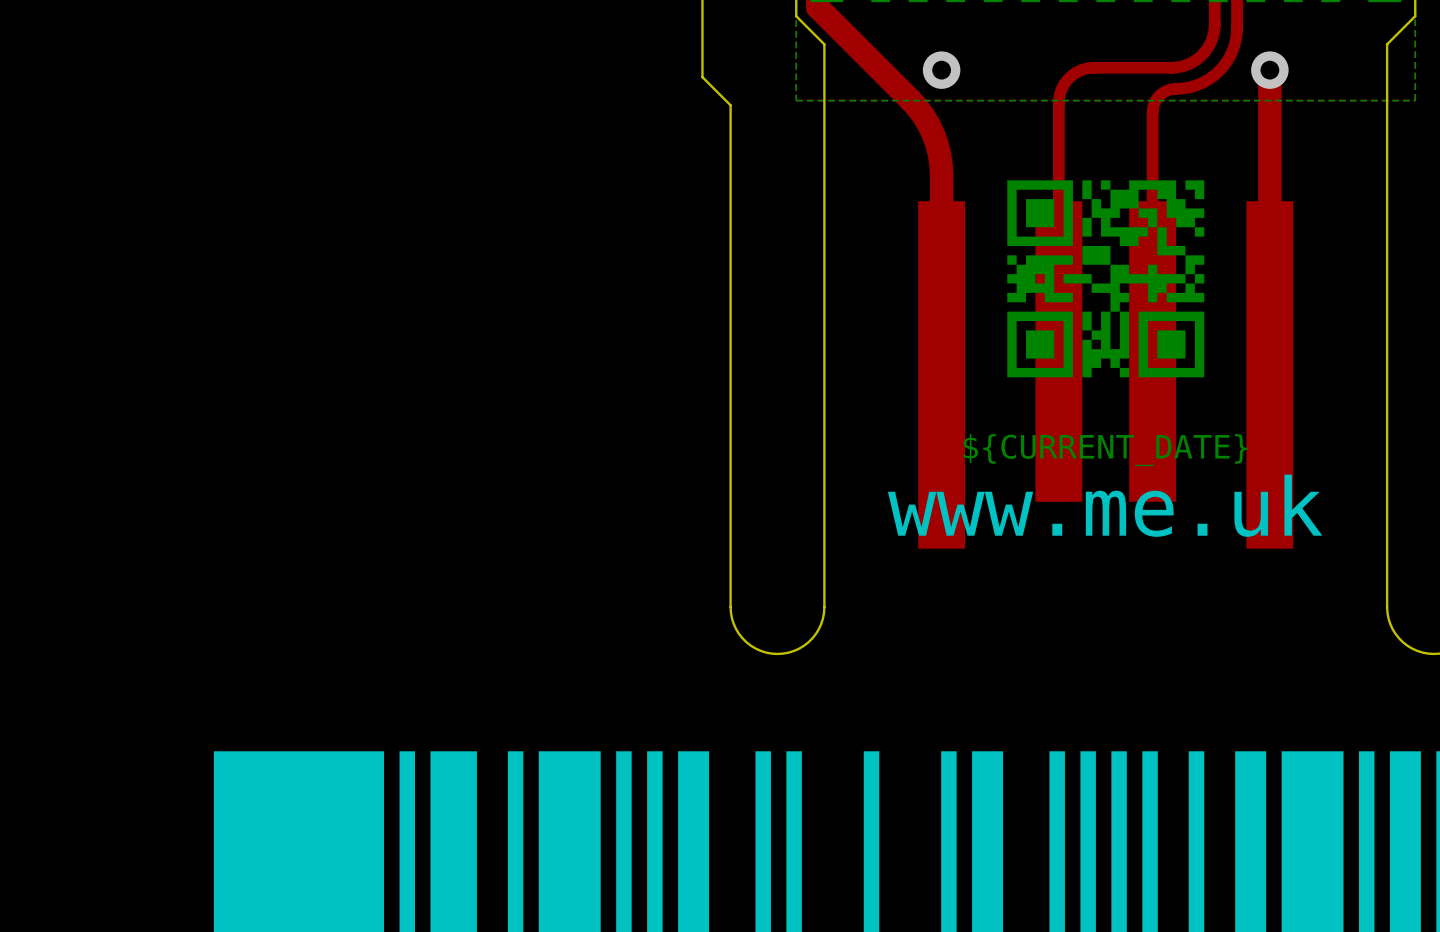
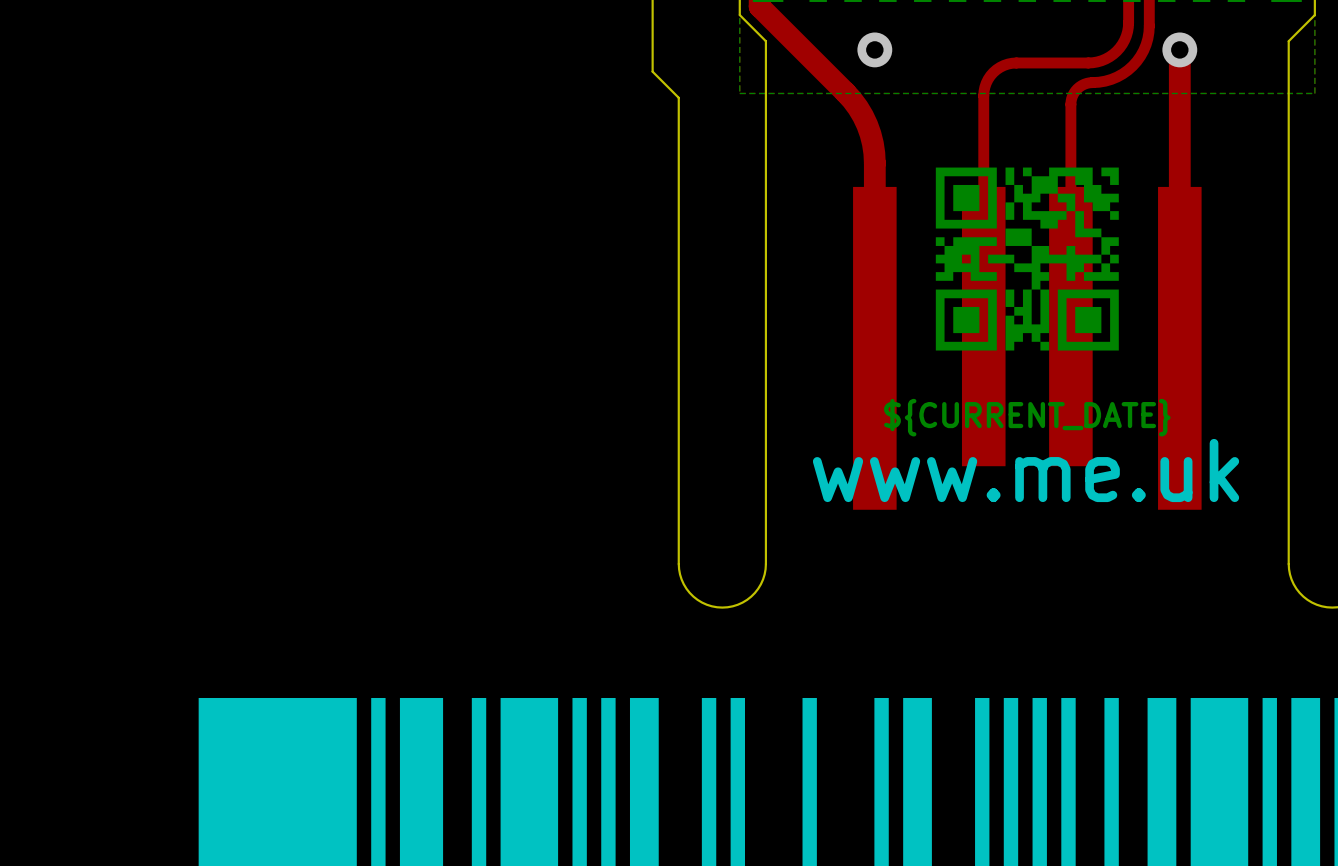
via position: (941, 70) -> (874, 49)
via position: (1269, 70) -> (1179, 49)

